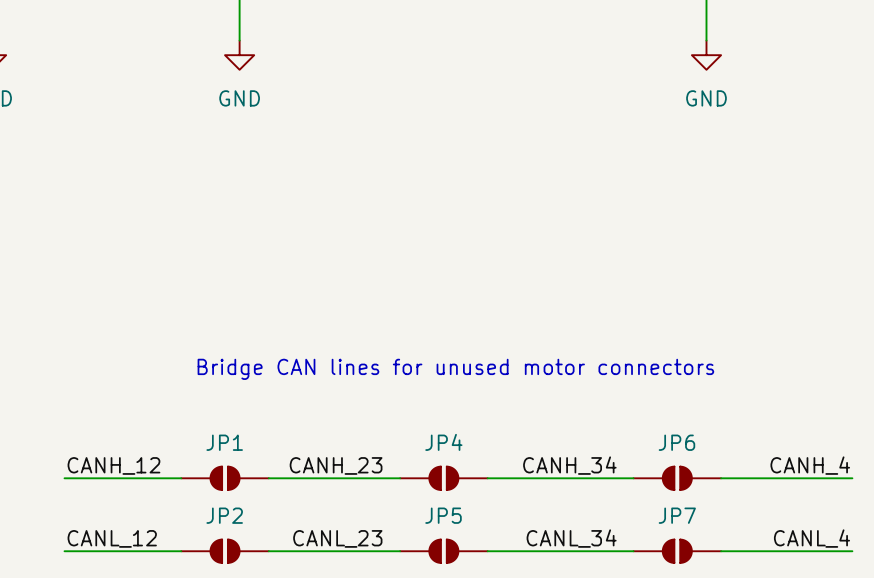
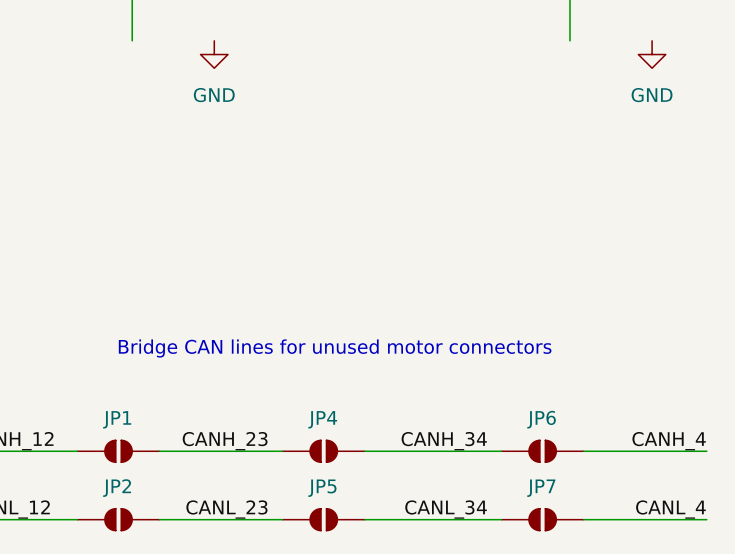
power symbol position: GND (239, 55) -> GND (214, 54)
power symbol position: GND (706, 55) -> GND (652, 54)

